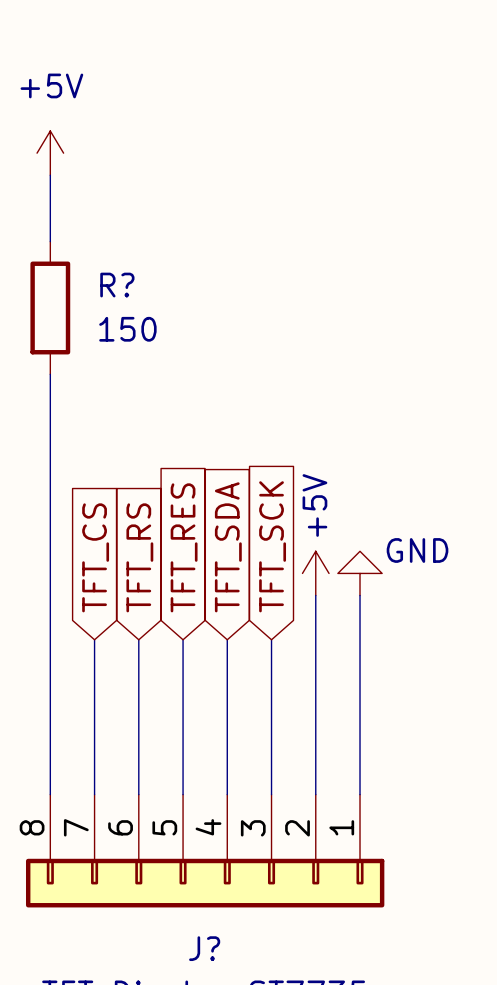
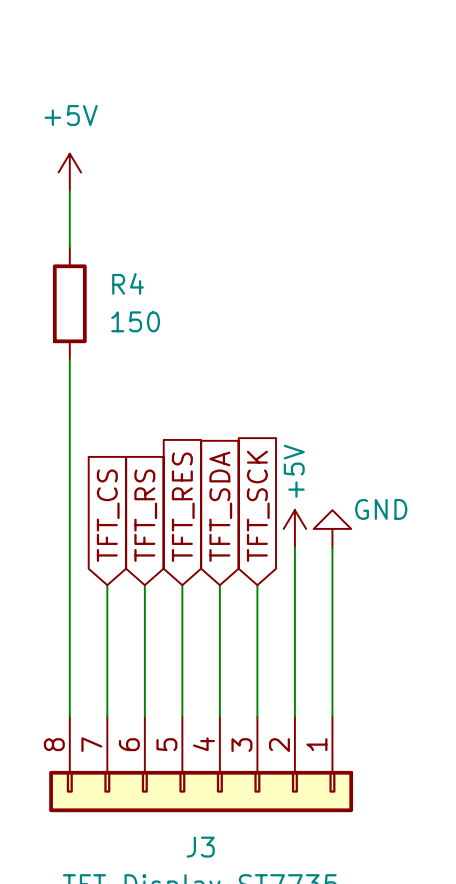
R? name: R? (117, 285) -> R4 (128, 283)
J? name: J? (204, 948) -> J3 (200, 847)

